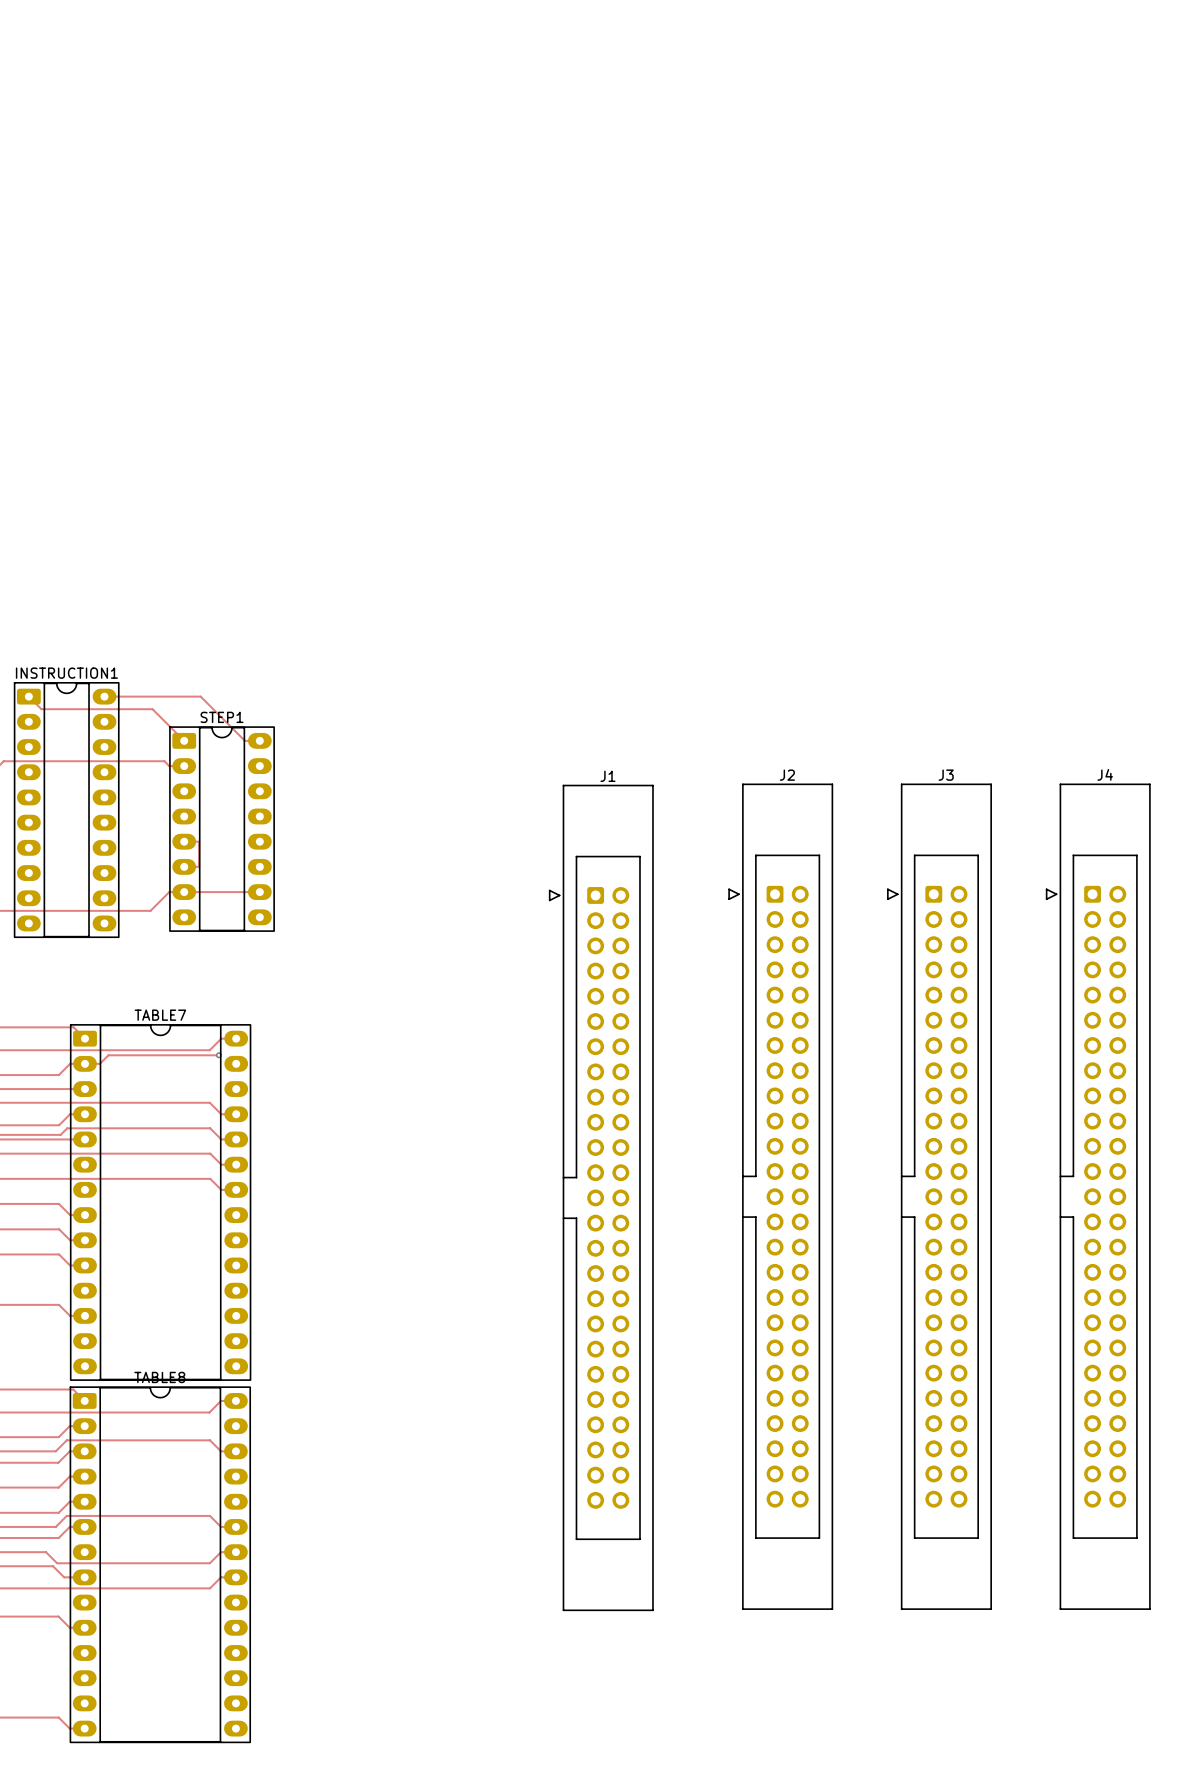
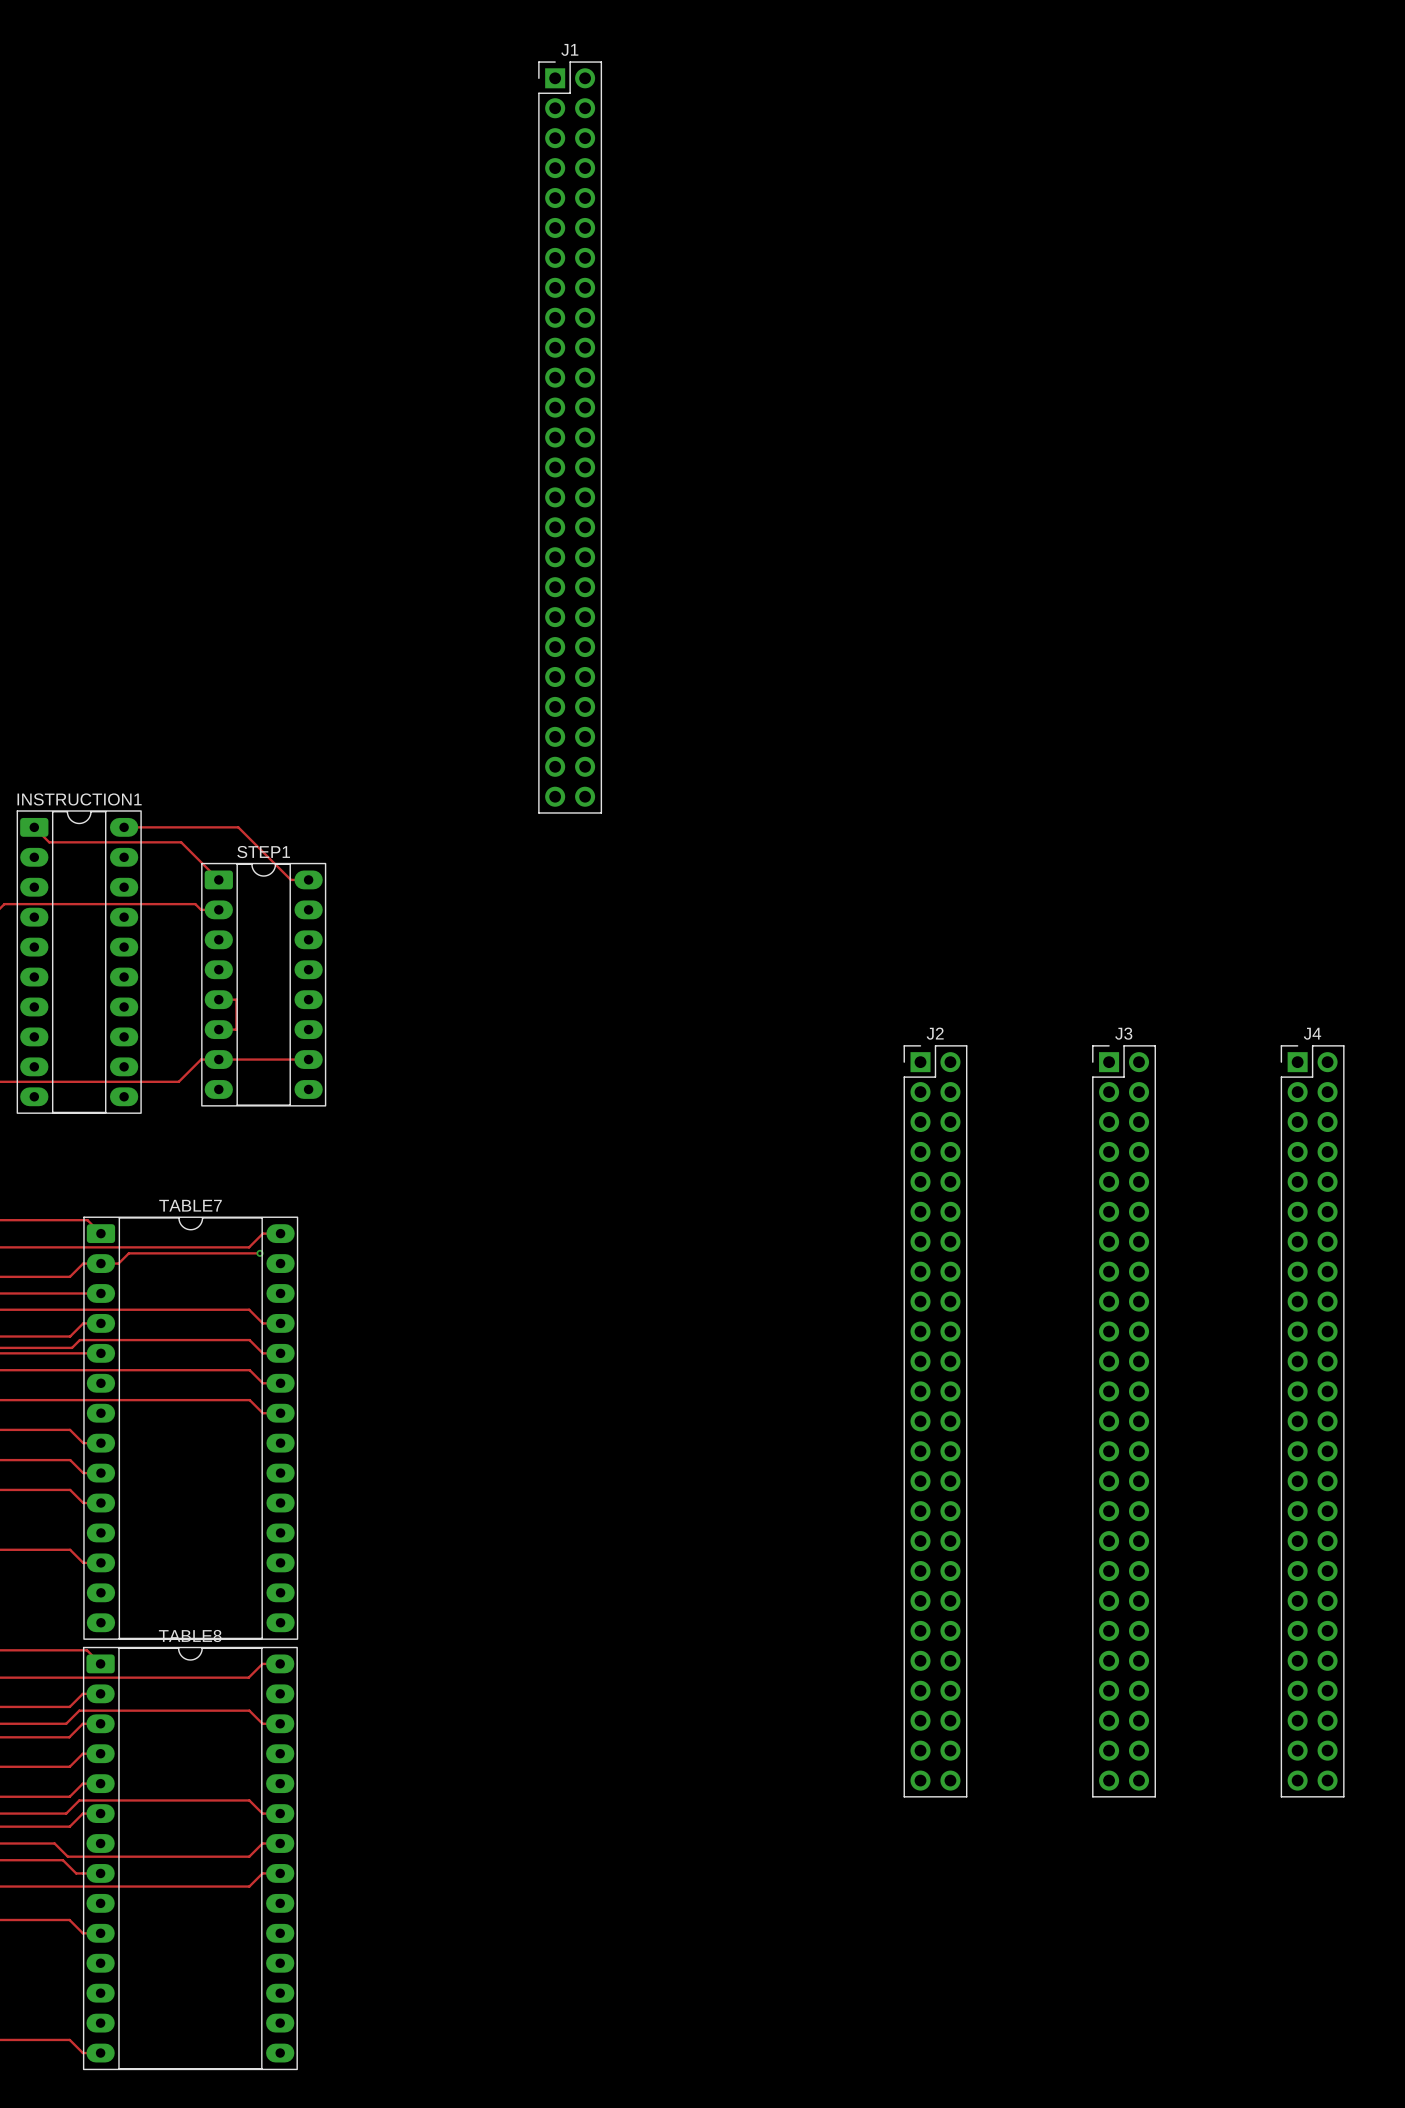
J4 name position: J4 (1105, 774) -> J4 (1312, 1033)
J2 name position: J2 (787, 775) -> J2 (935, 1033)
J3 name position: J3 (946, 775) -> J3 (1123, 1033)
J1 name position: J1 (607, 776) -> J1 (569, 49)
J2 footprint: [728, 783, 833, 1610] -> [903, 1045, 968, 1798]
J3 footprint: [887, 783, 992, 1610] -> [1092, 1045, 1156, 1798]
J4 footprint: [1046, 783, 1151, 1610] -> [1280, 1045, 1345, 1798]
J1 footprint: [549, 784, 654, 1611] -> [538, 61, 603, 814]

